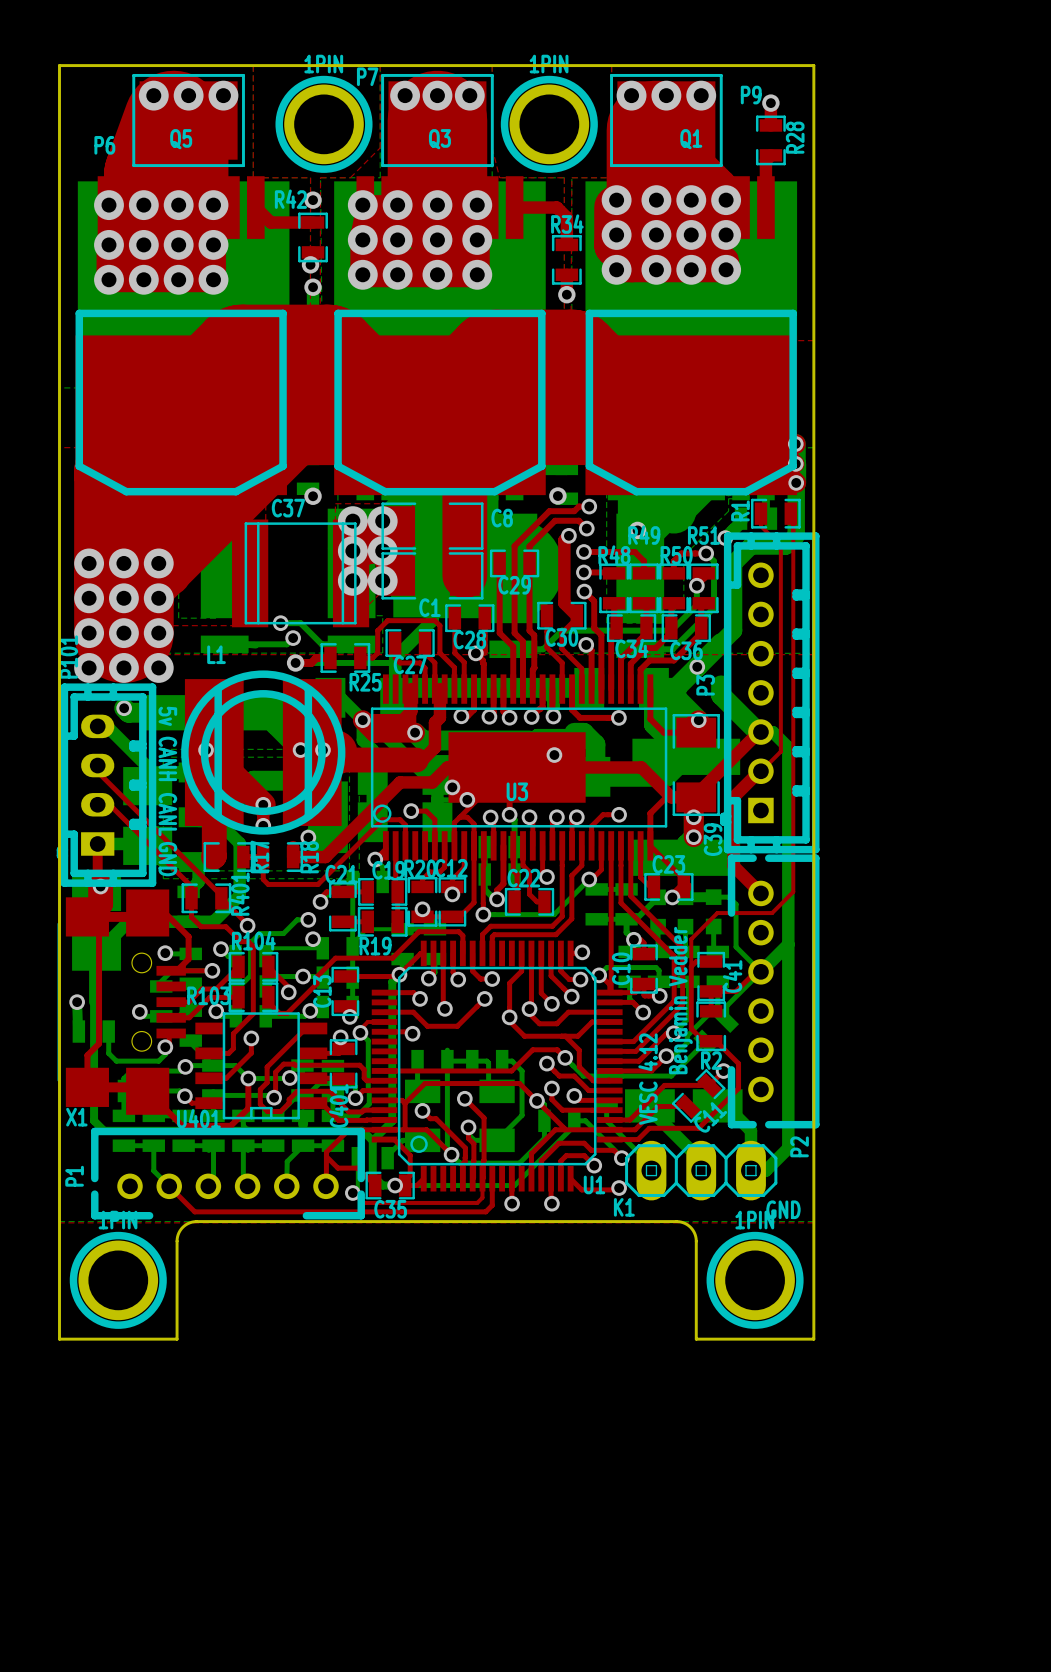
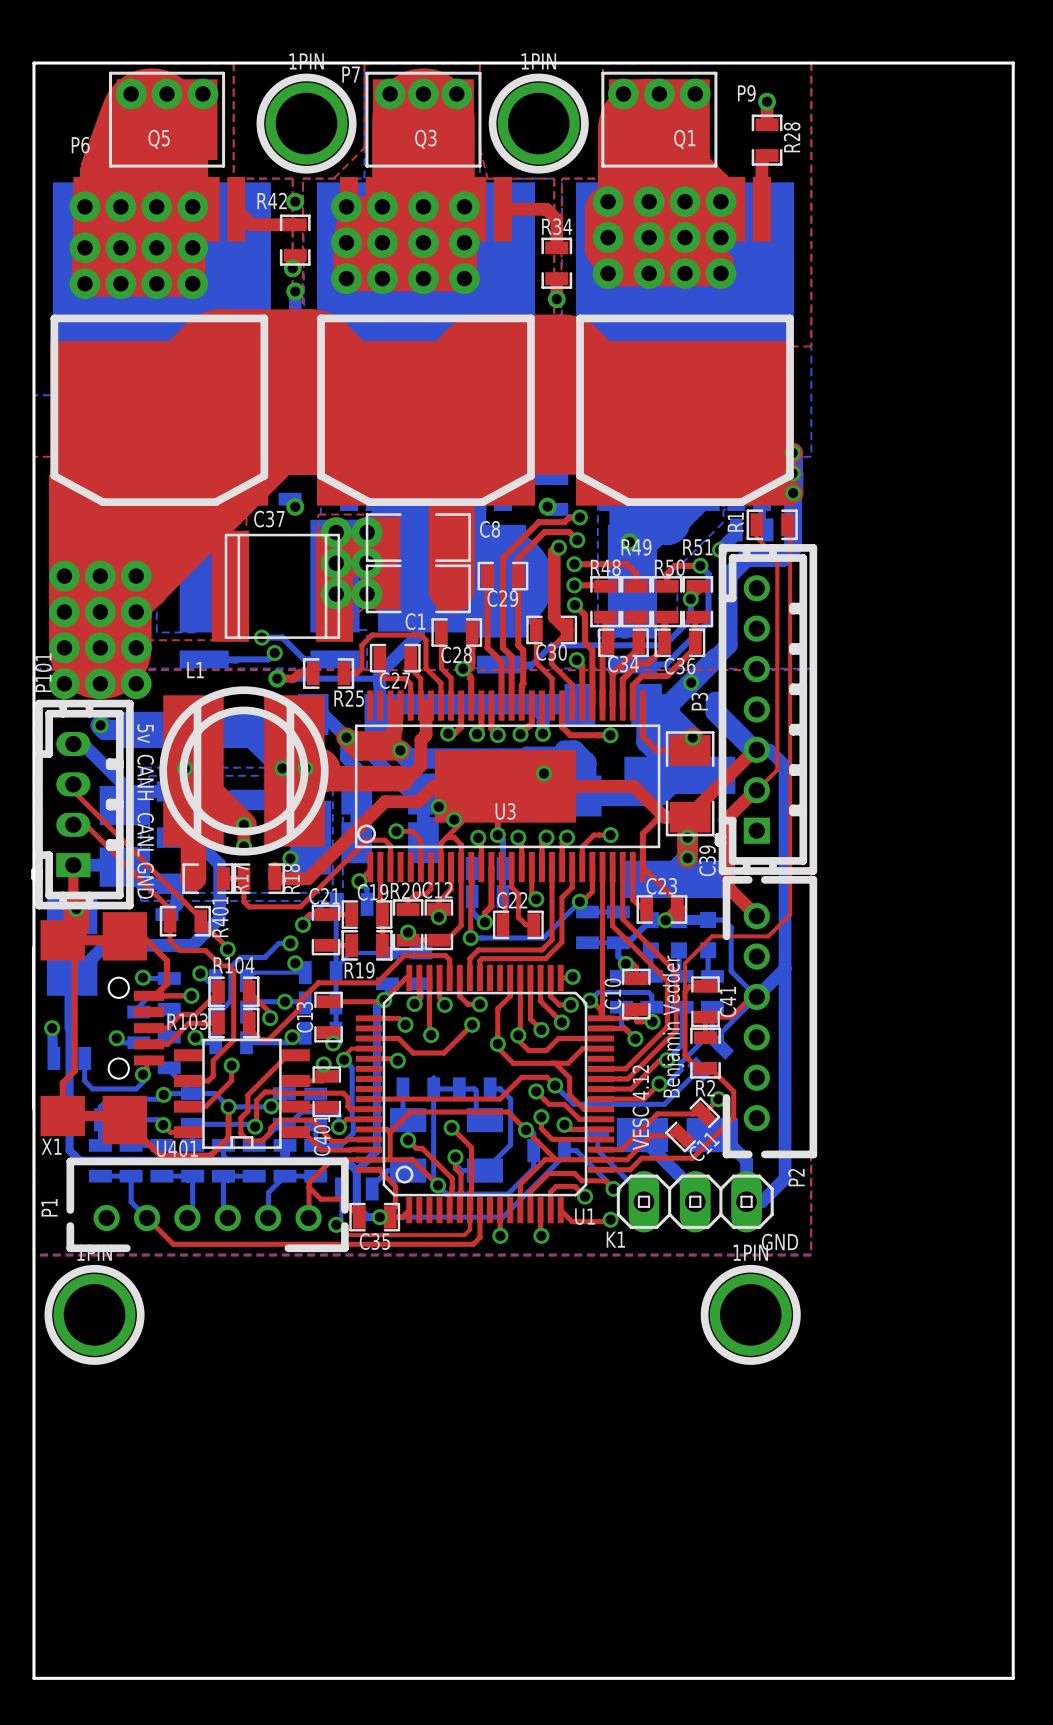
board edge: (813, 65) (813, 1339) (696, 1339) (696, 1238) (690, 1227) (676, 1221) (192, 1222) (181, 1228) (177, 1238) (177, 1339) (59, 1339) -> (811, 63) (1013, 63) (1013, 1678) (33, 1678) (33, 1375)

